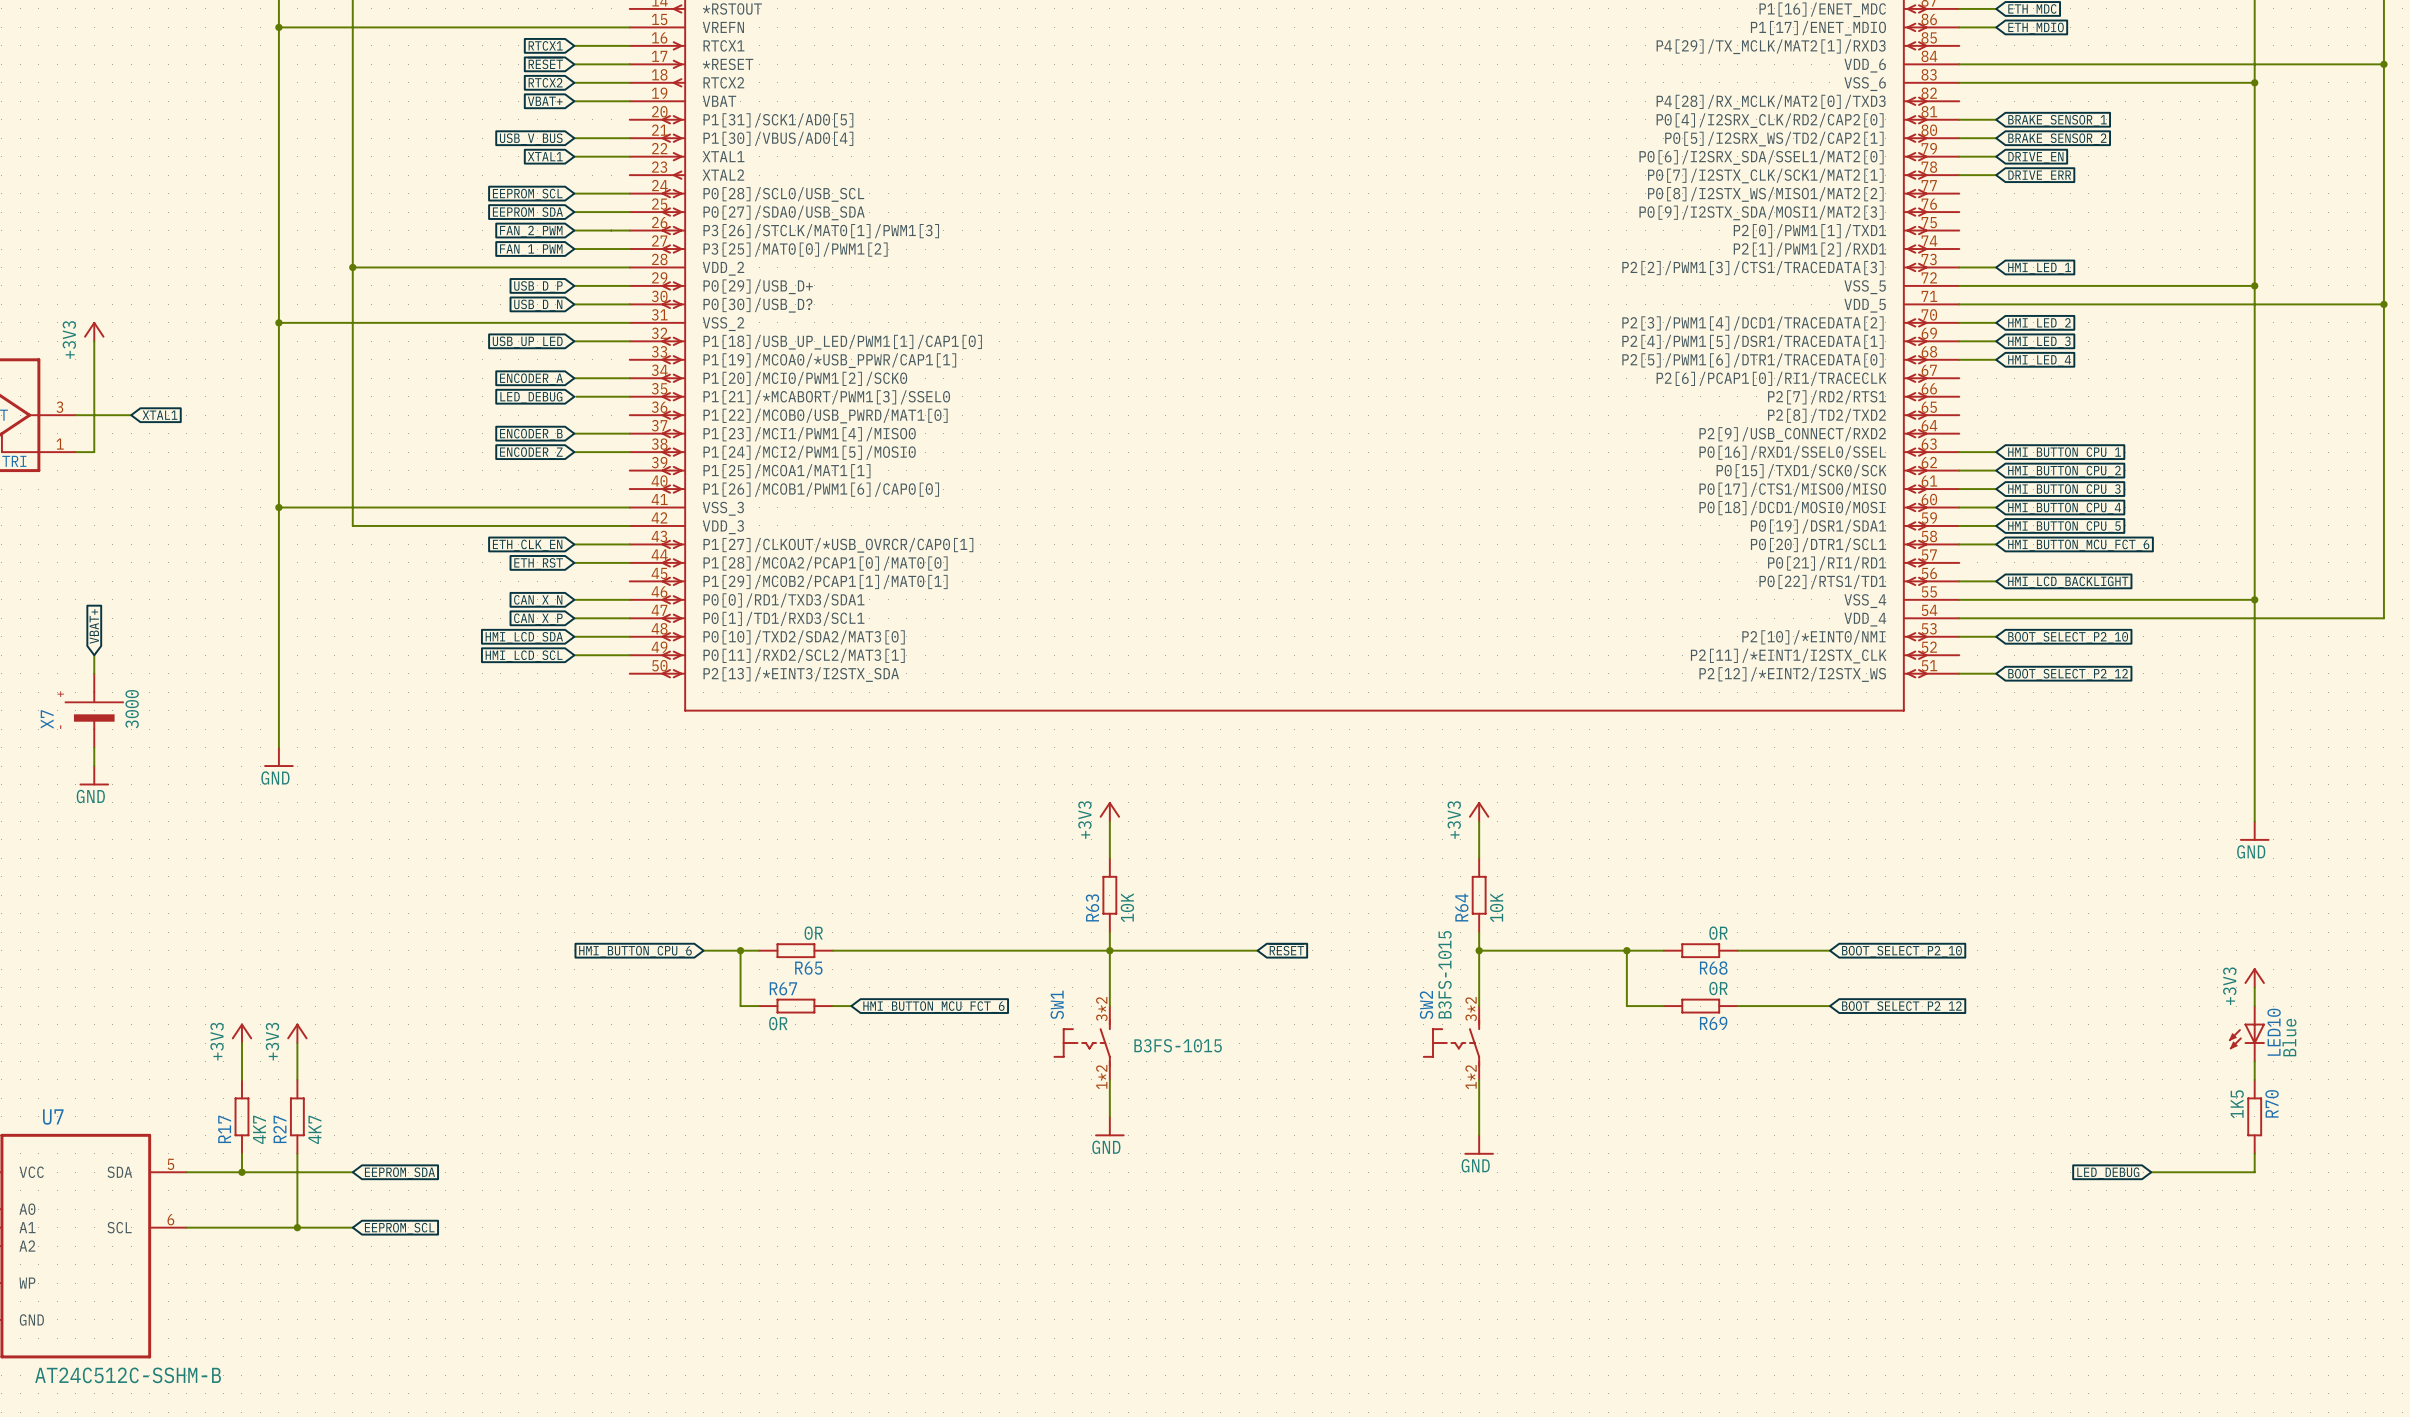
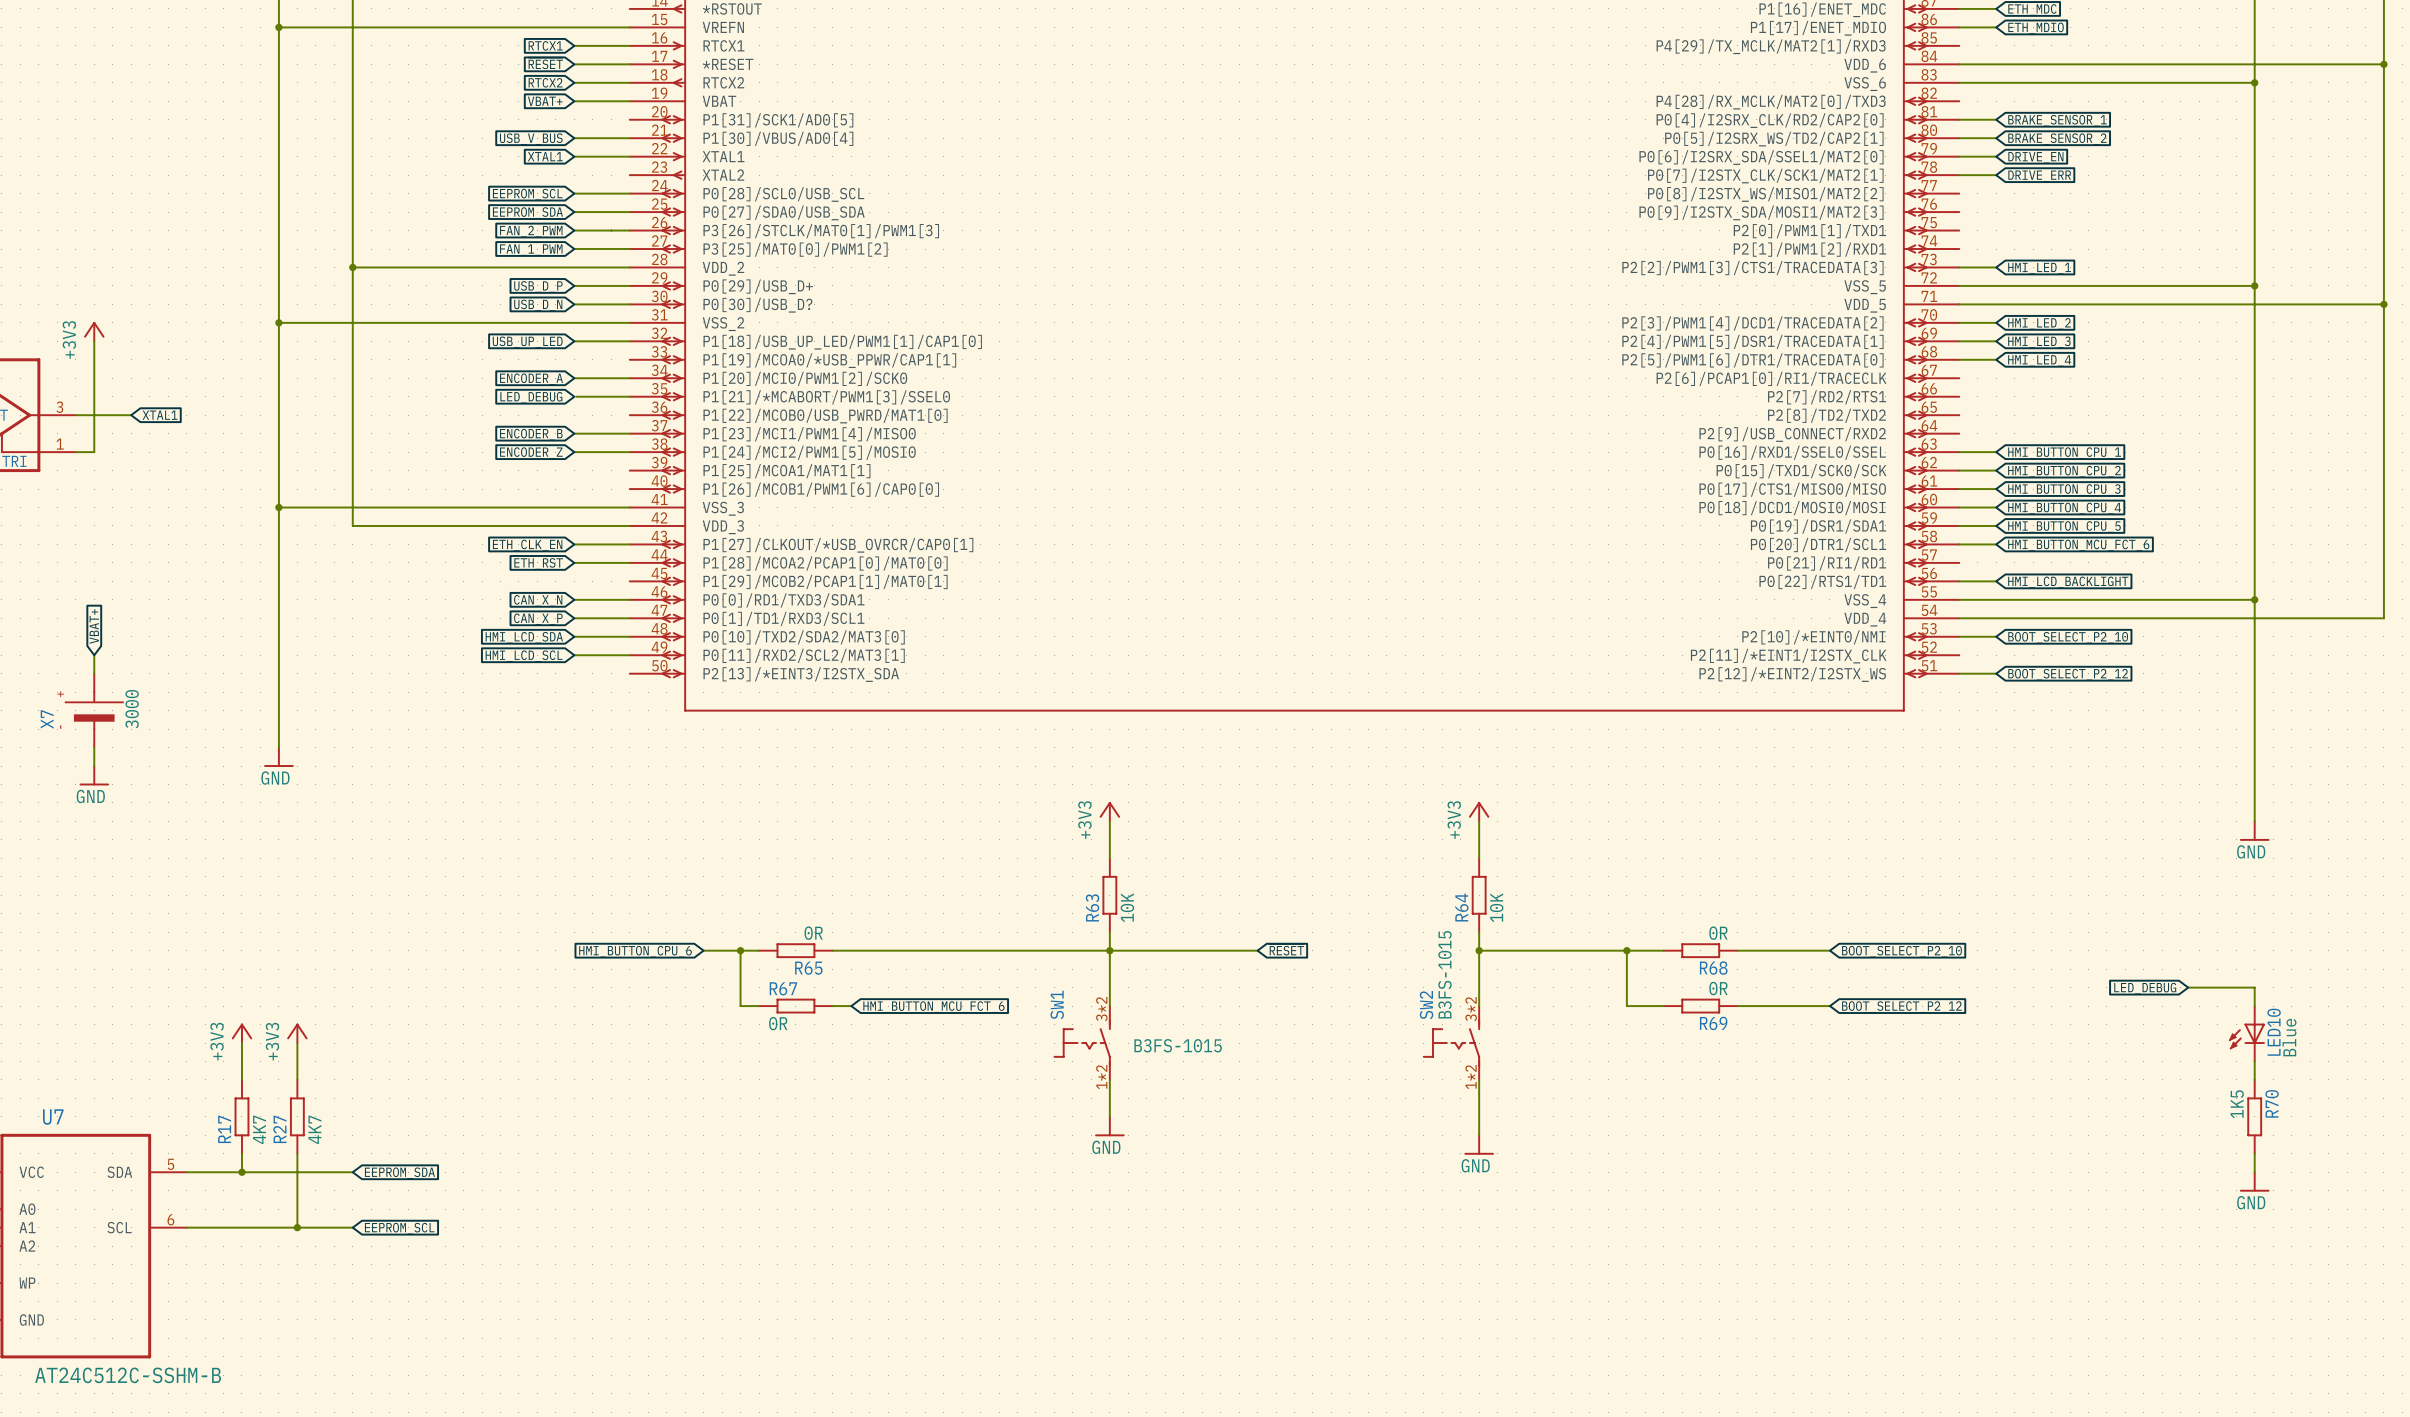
power symbol: +3V3 (2254, 977) -> none
wire: none -> (2188, 987) (2254, 987)
global label: none -> LED_DEBUG (2145, 988)
wire: (2151, 1172) (2254, 1172) -> none
global label: LED_DEBUG (2108, 1173) -> none
power symbol: none -> GND (2254, 1181)

